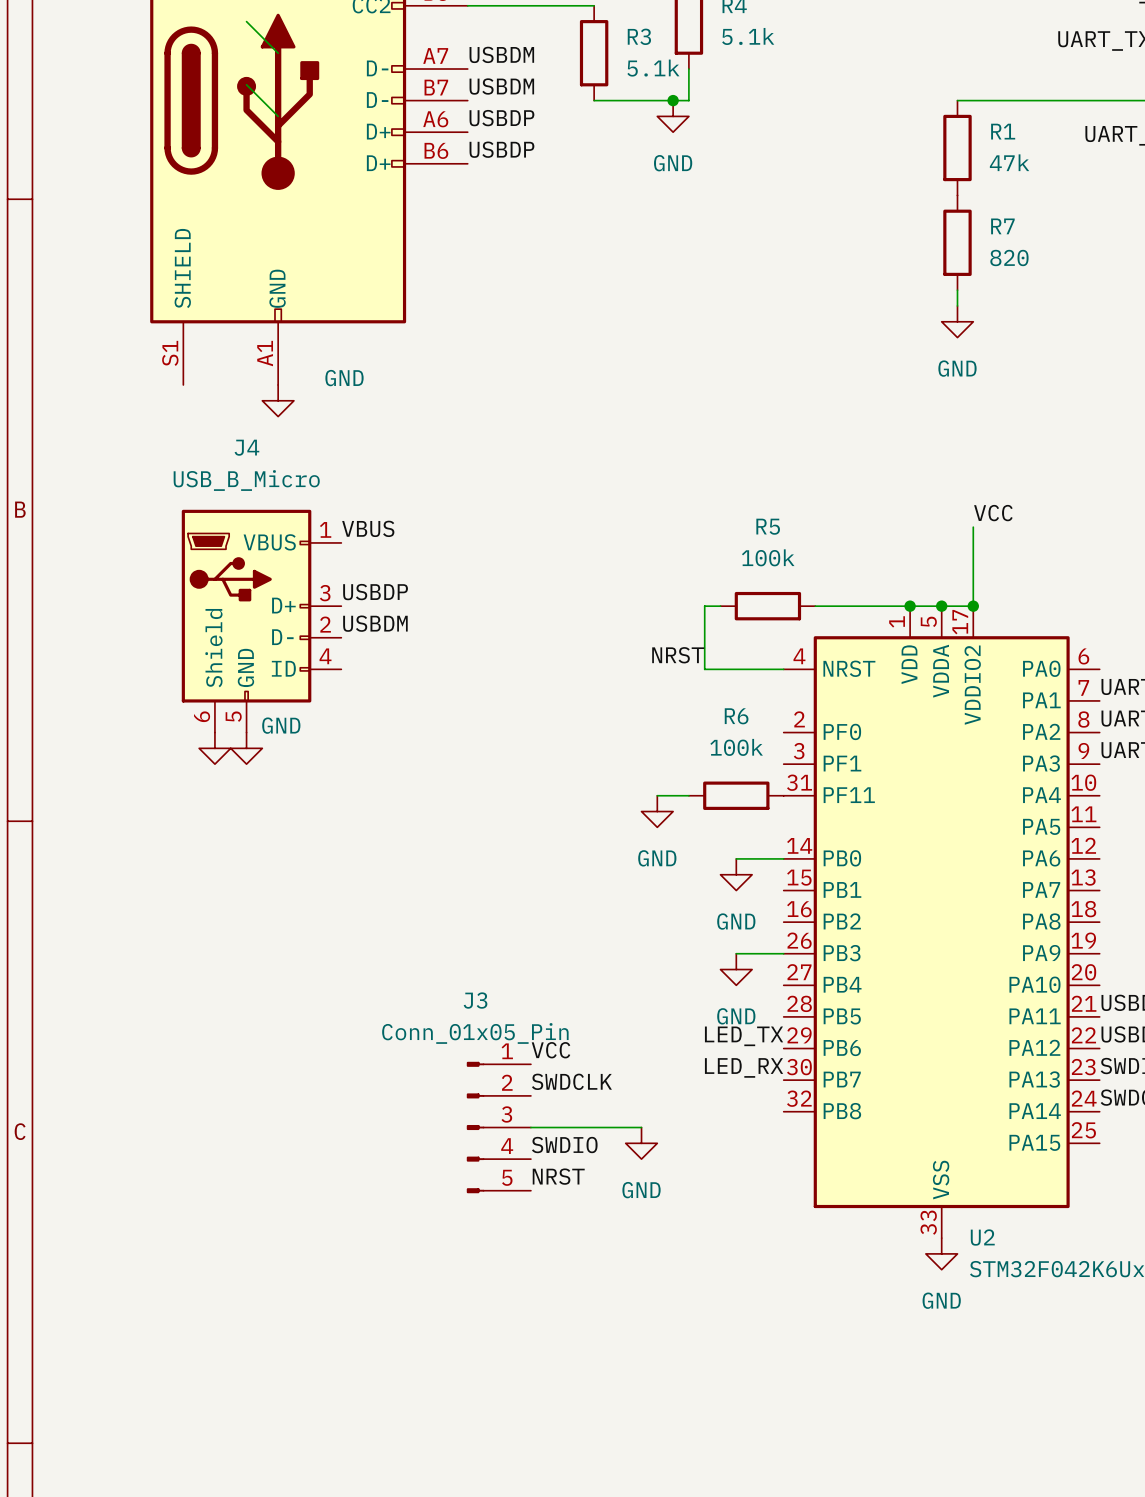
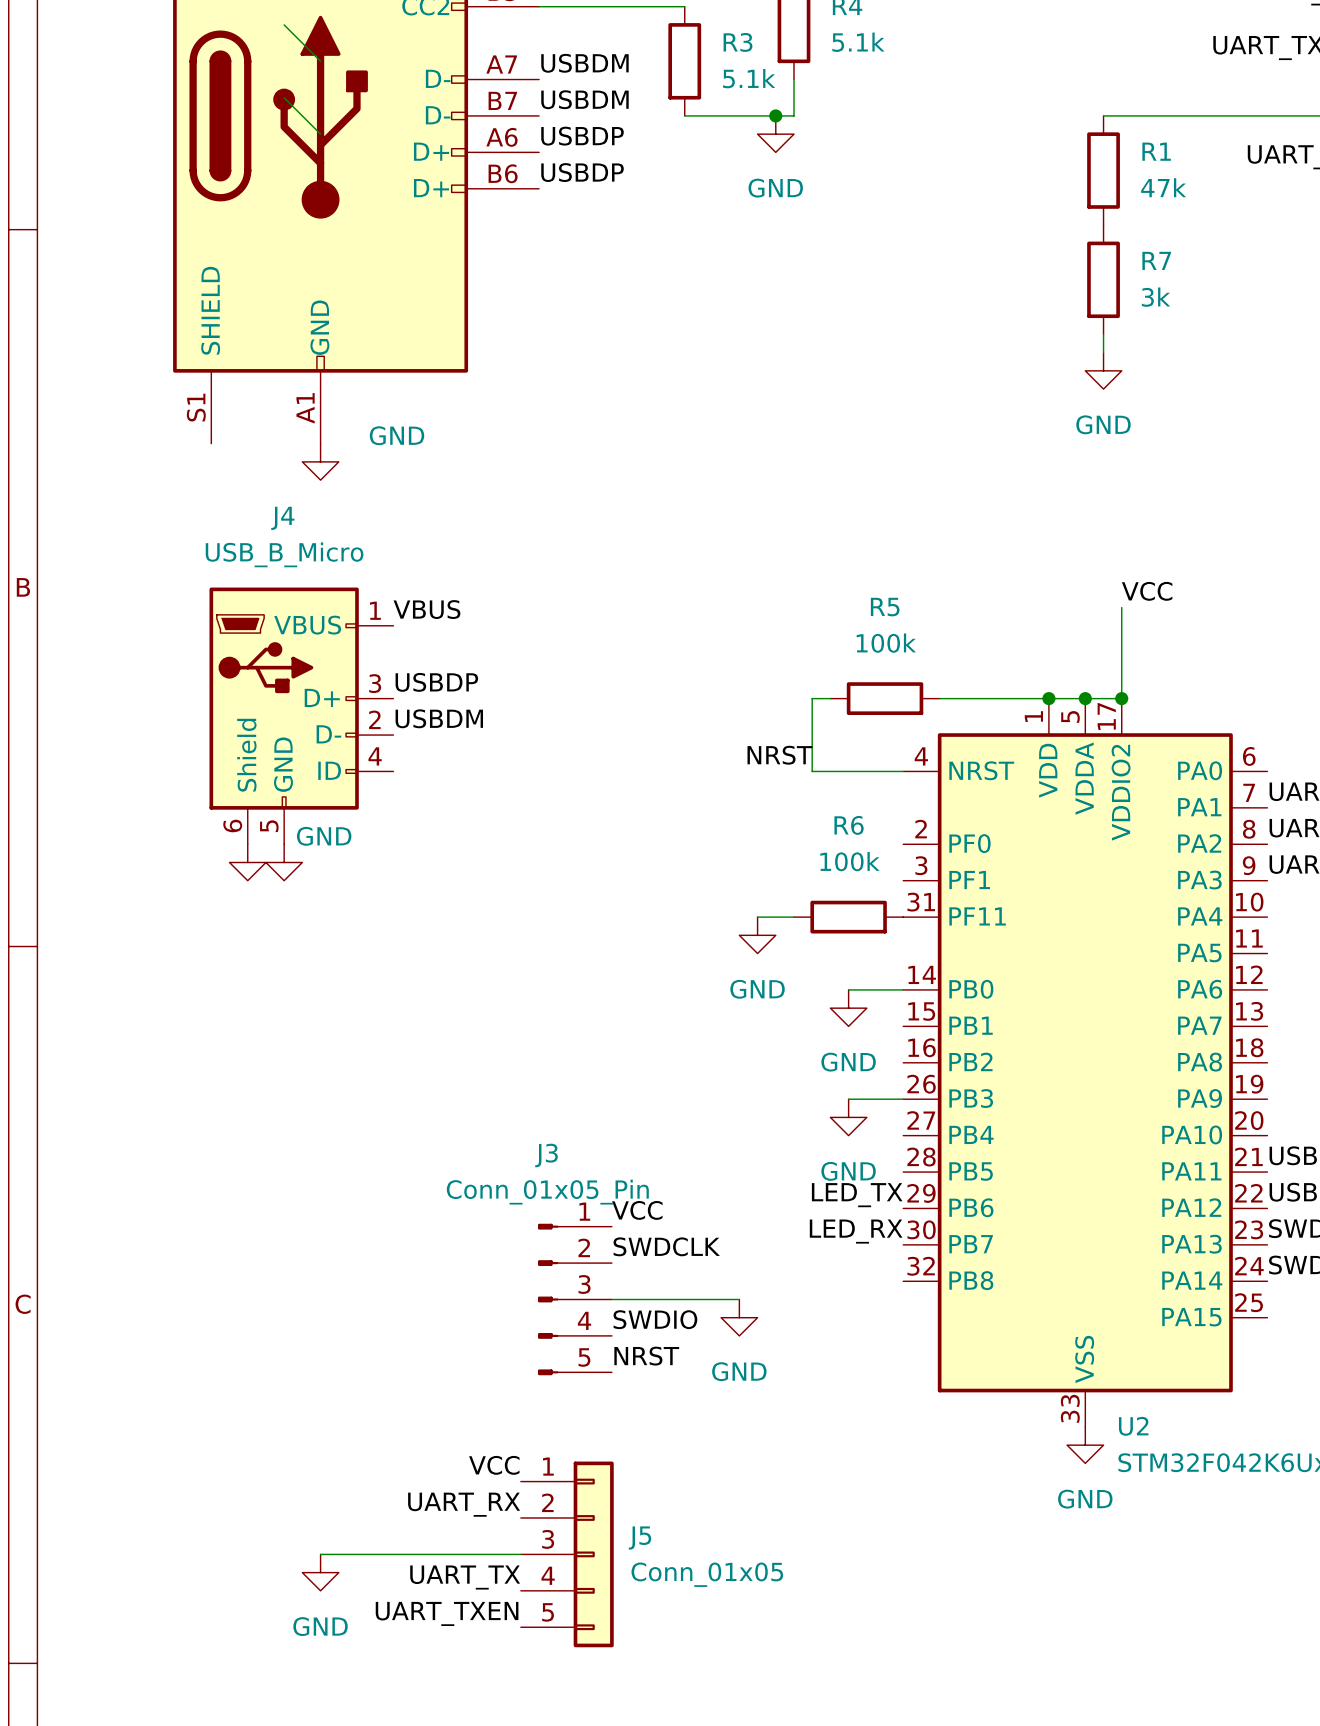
R7 value: 820 (1009, 258) -> 3k (1156, 297)
label: none -> VCC (494, 1465)
label: none -> UART_RX (464, 1504)
wire: none -> (320, 1554) (520, 1554)
J5: none -> Conn_01x05 (567, 1554)
power symbol: none -> GND (320, 1572)
label: none -> UART_TX (465, 1577)
label: none -> UART_TXEN (447, 1613)

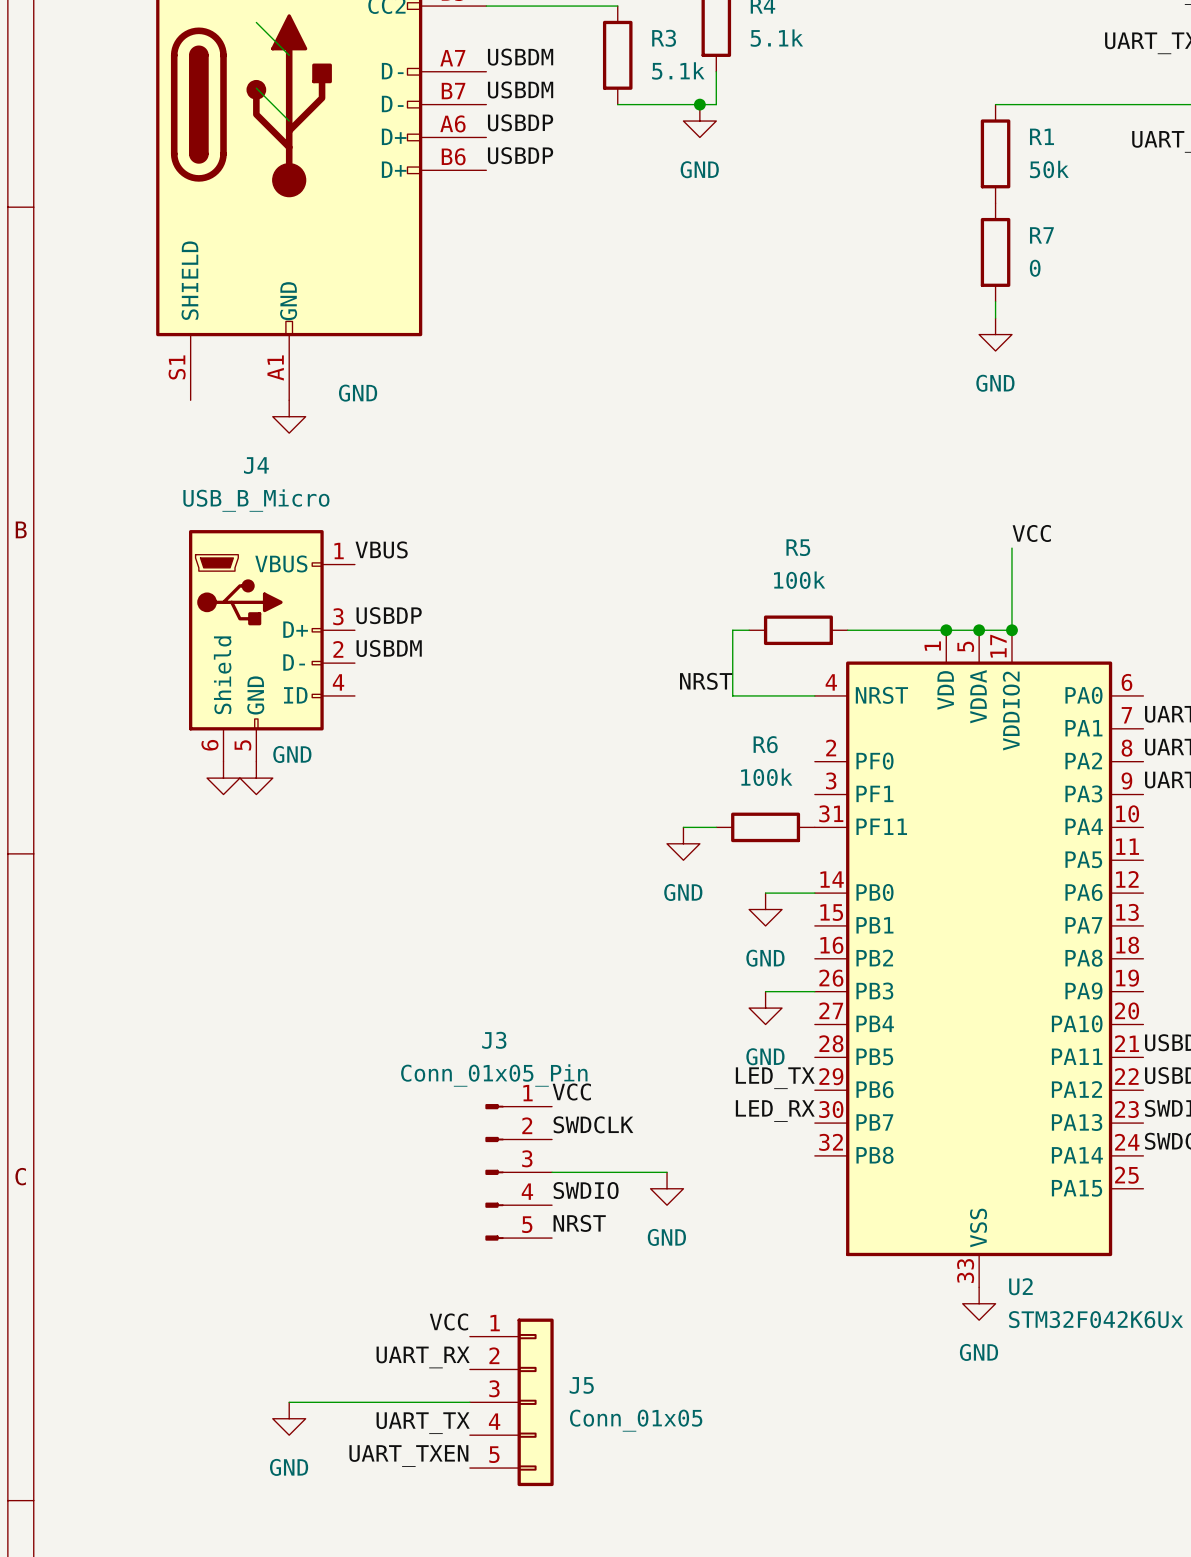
R1 value: 47k (1163, 187) -> 50k (1049, 169)
R7 value: 3k (1156, 297) -> 0 (1035, 268)

